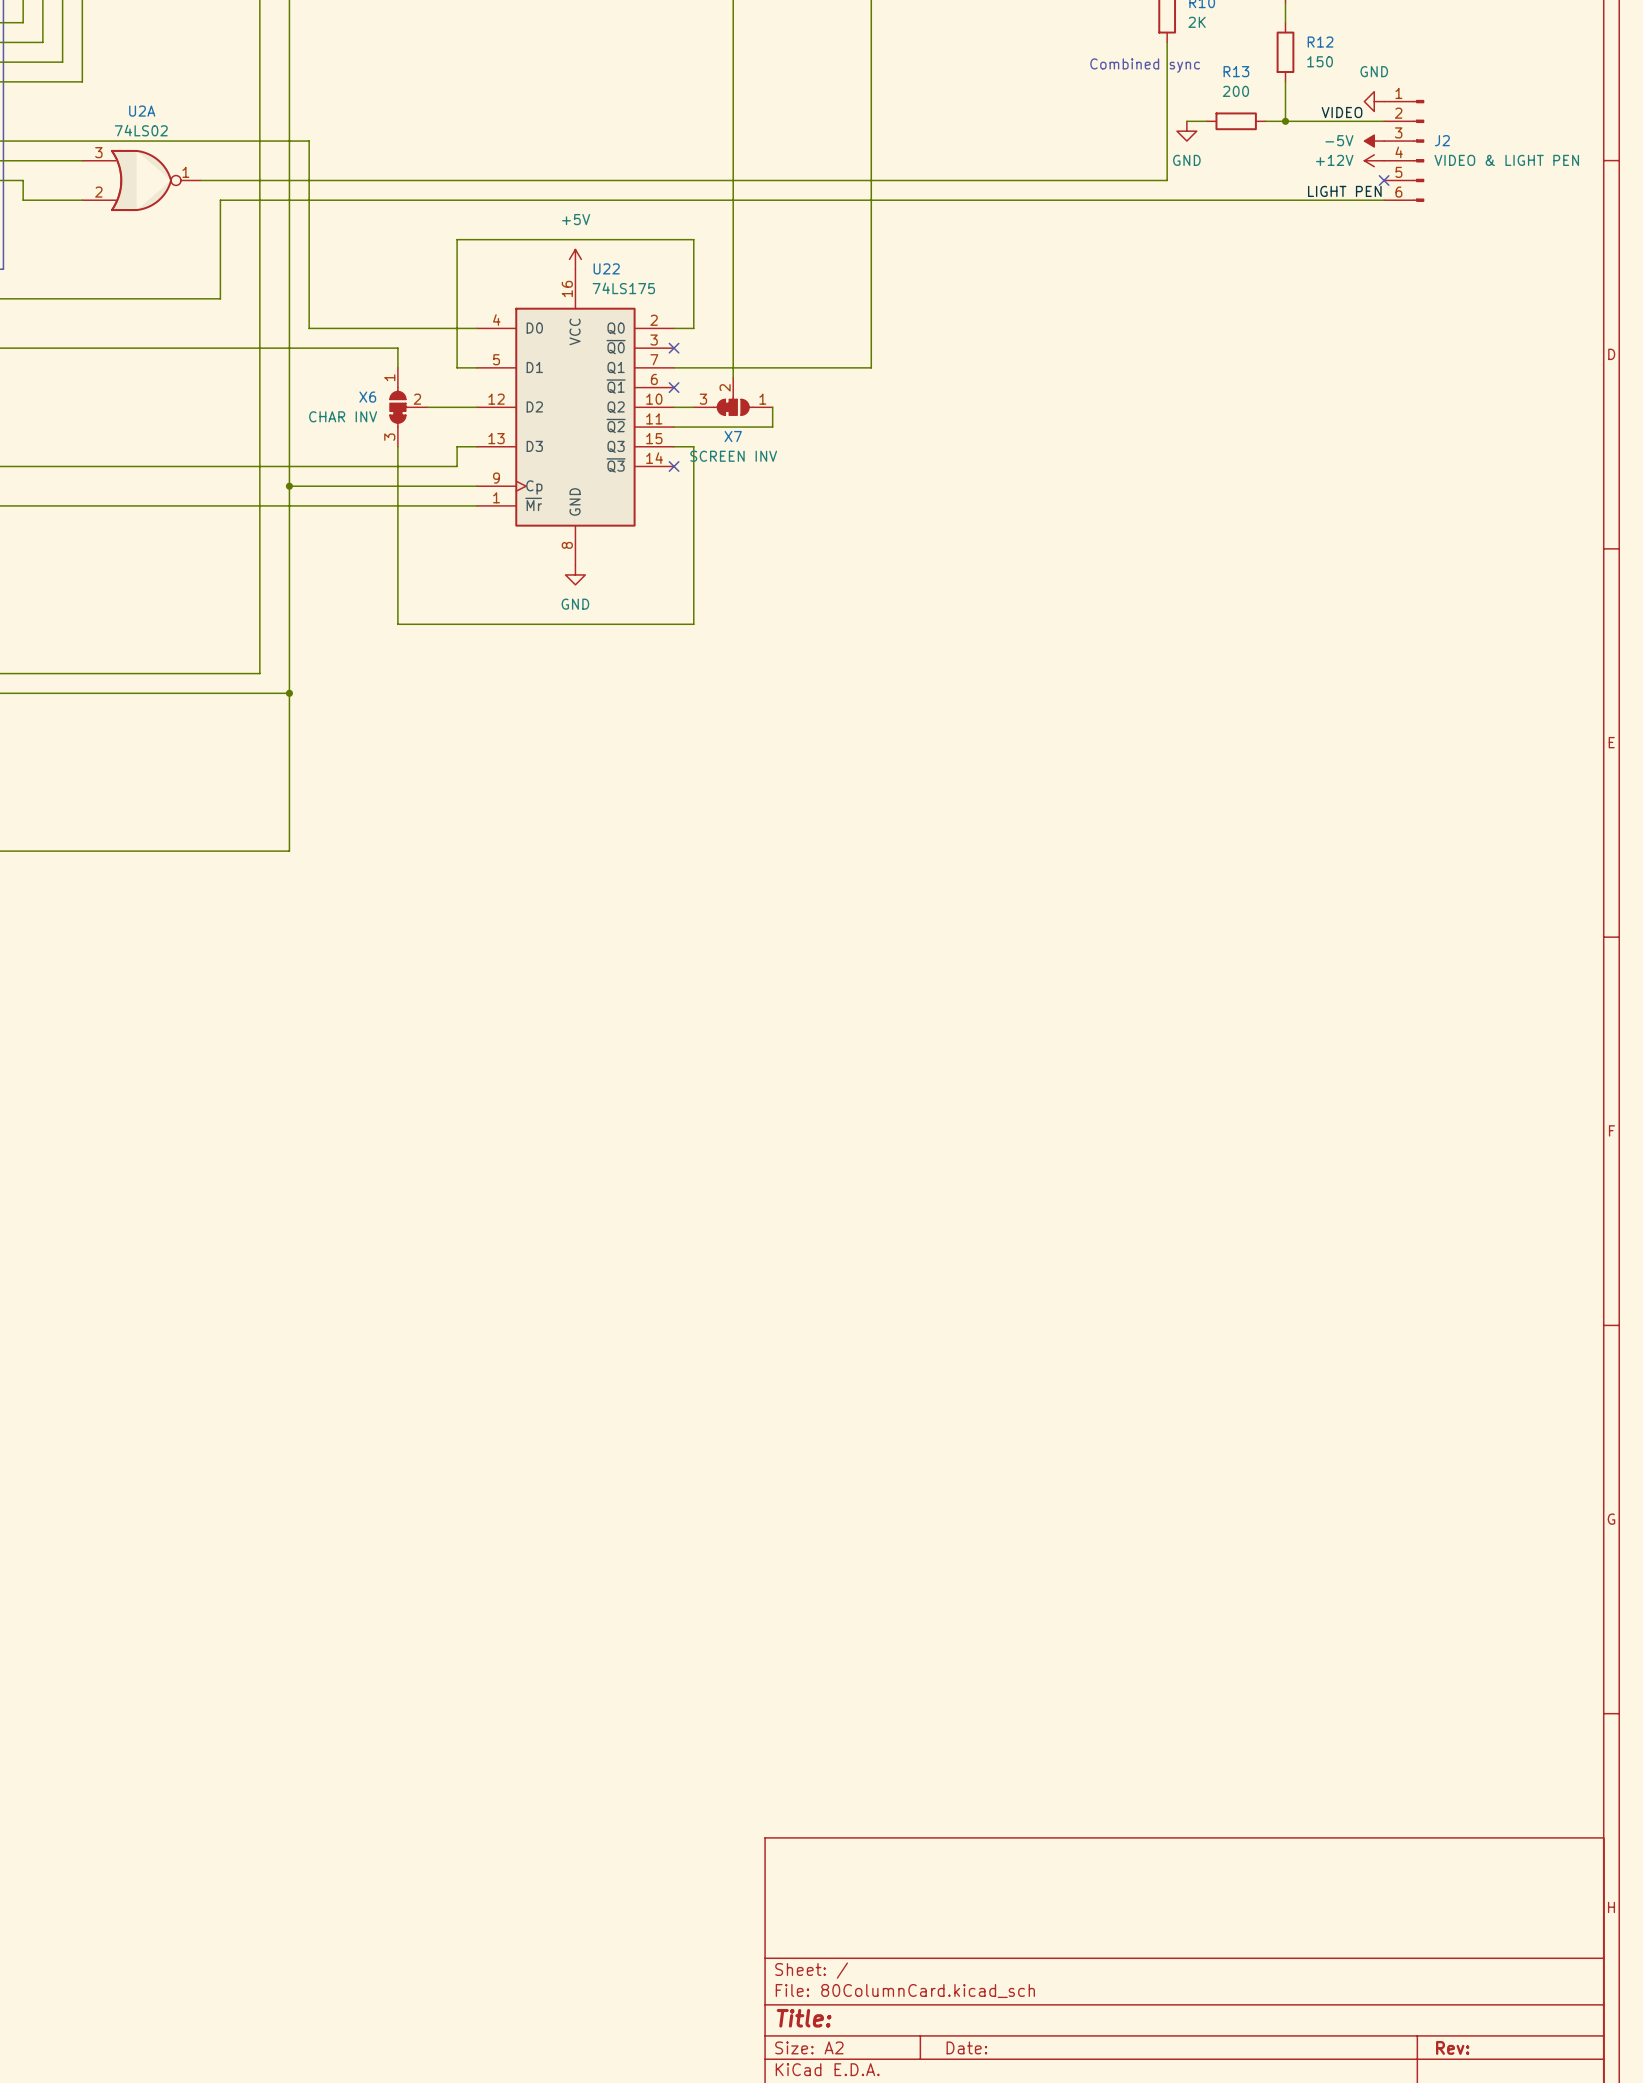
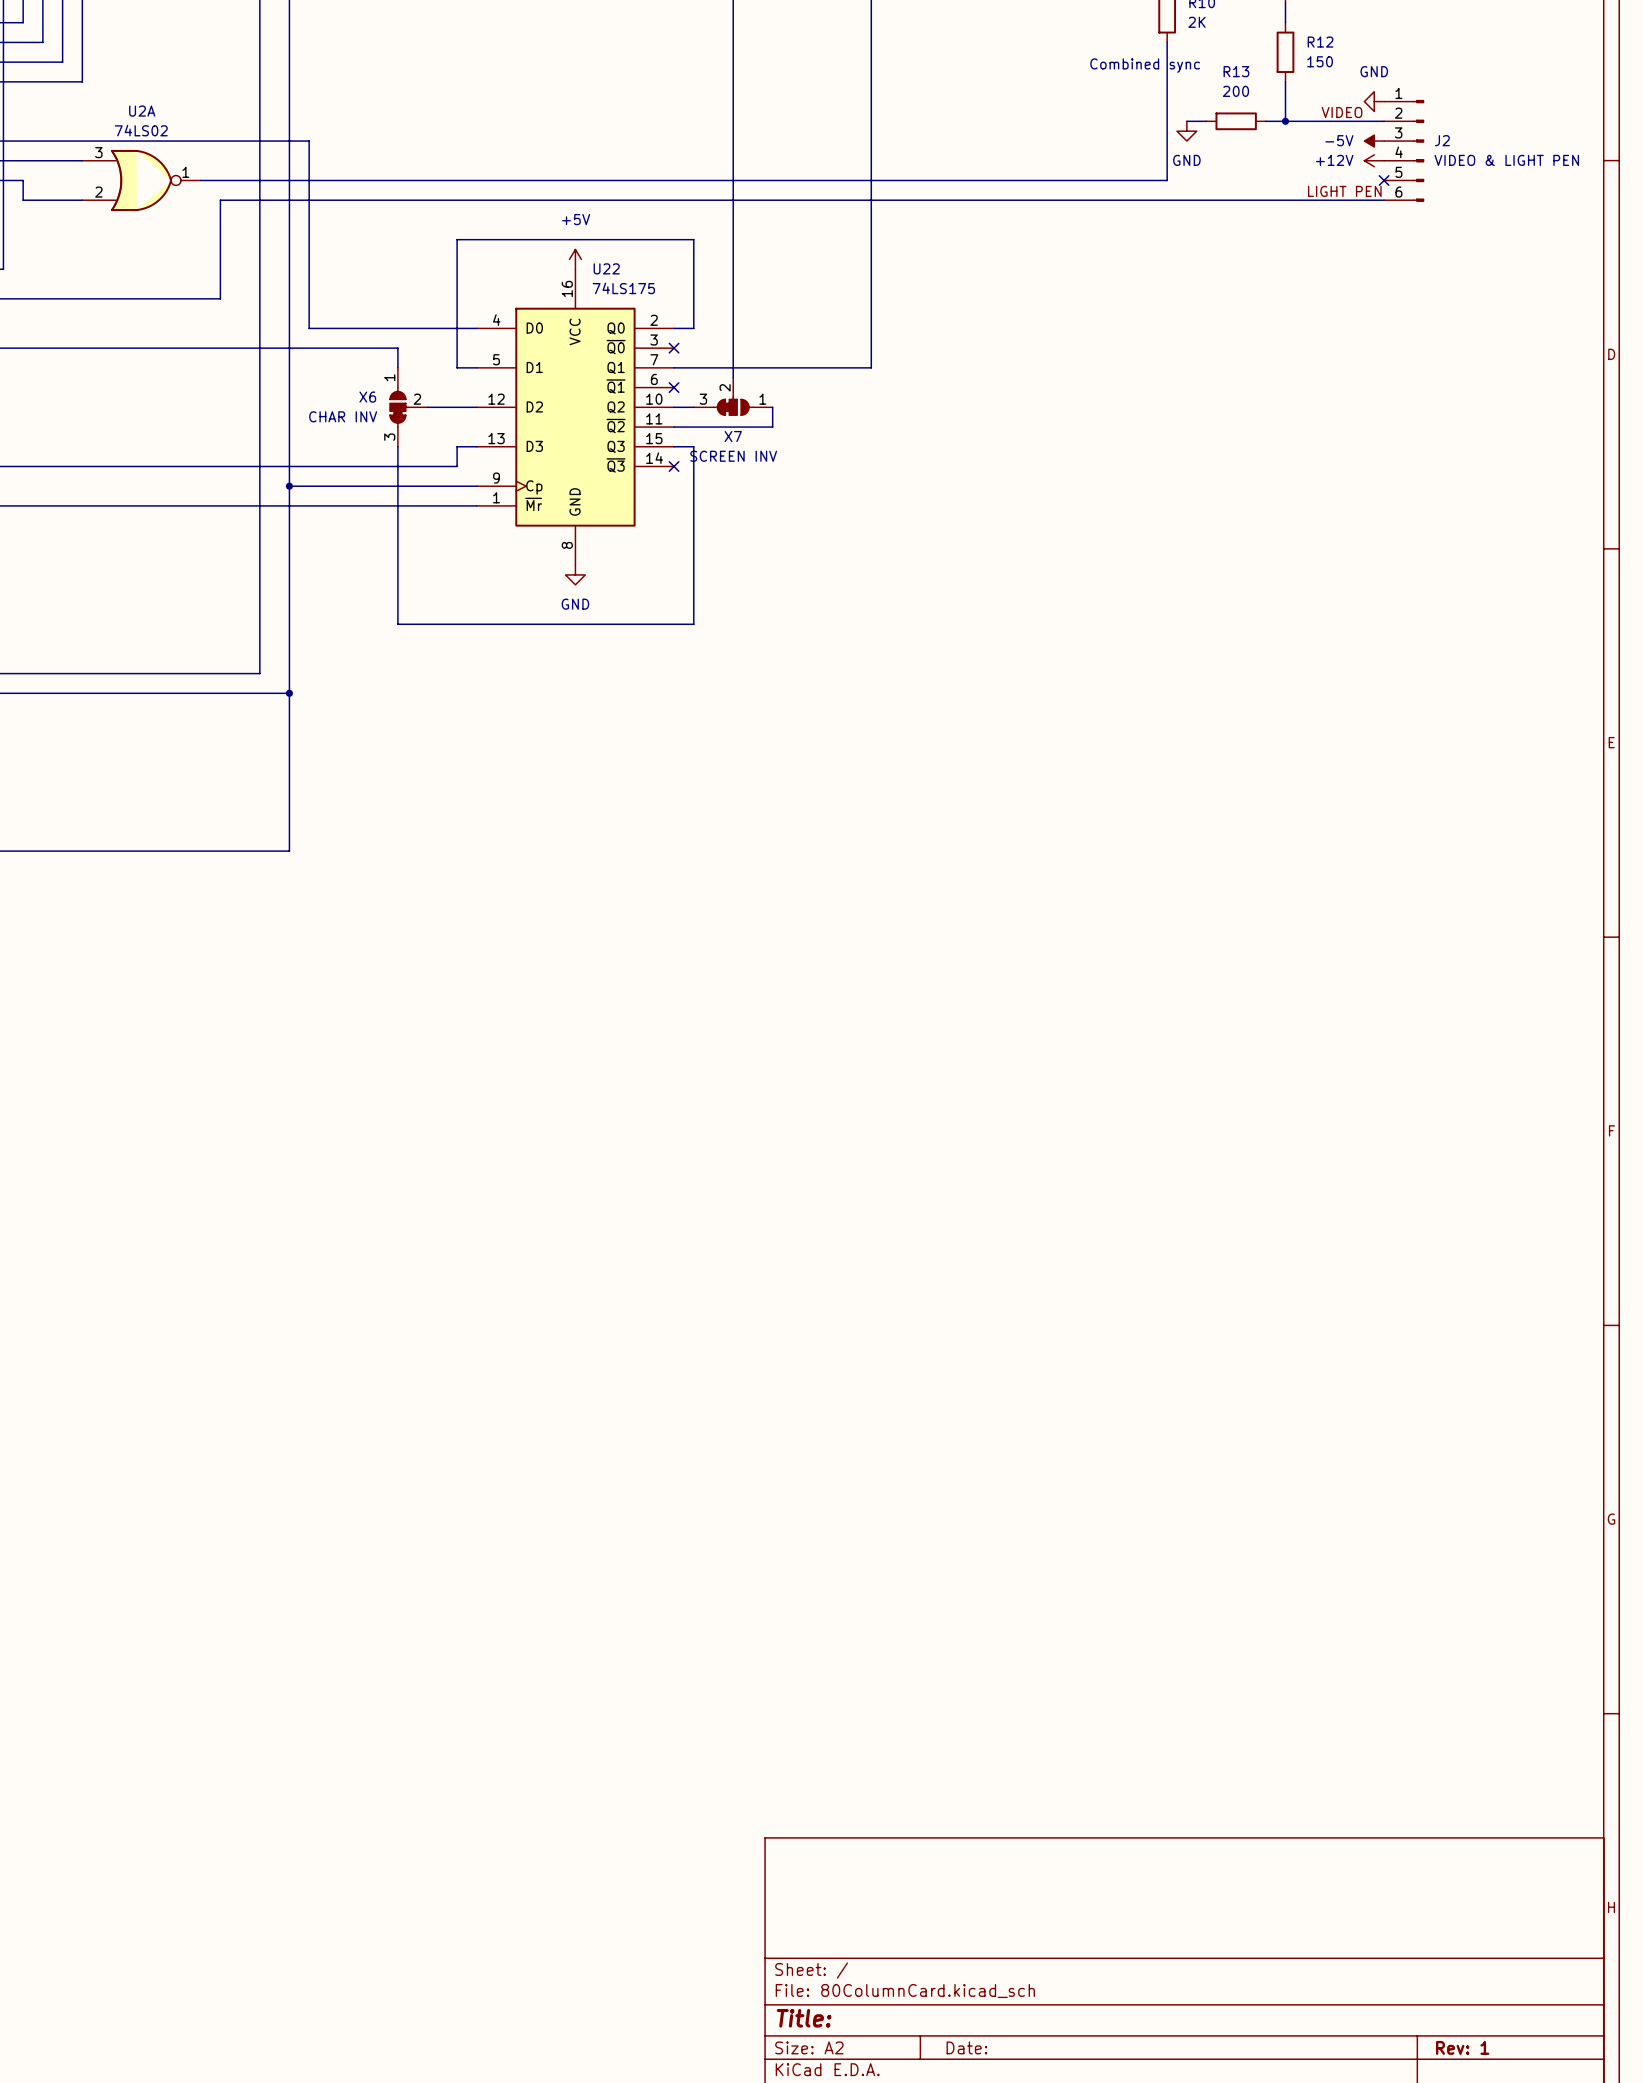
title block: Rev: (1452, 2047) -> Rev: 1 (1462, 2047)

